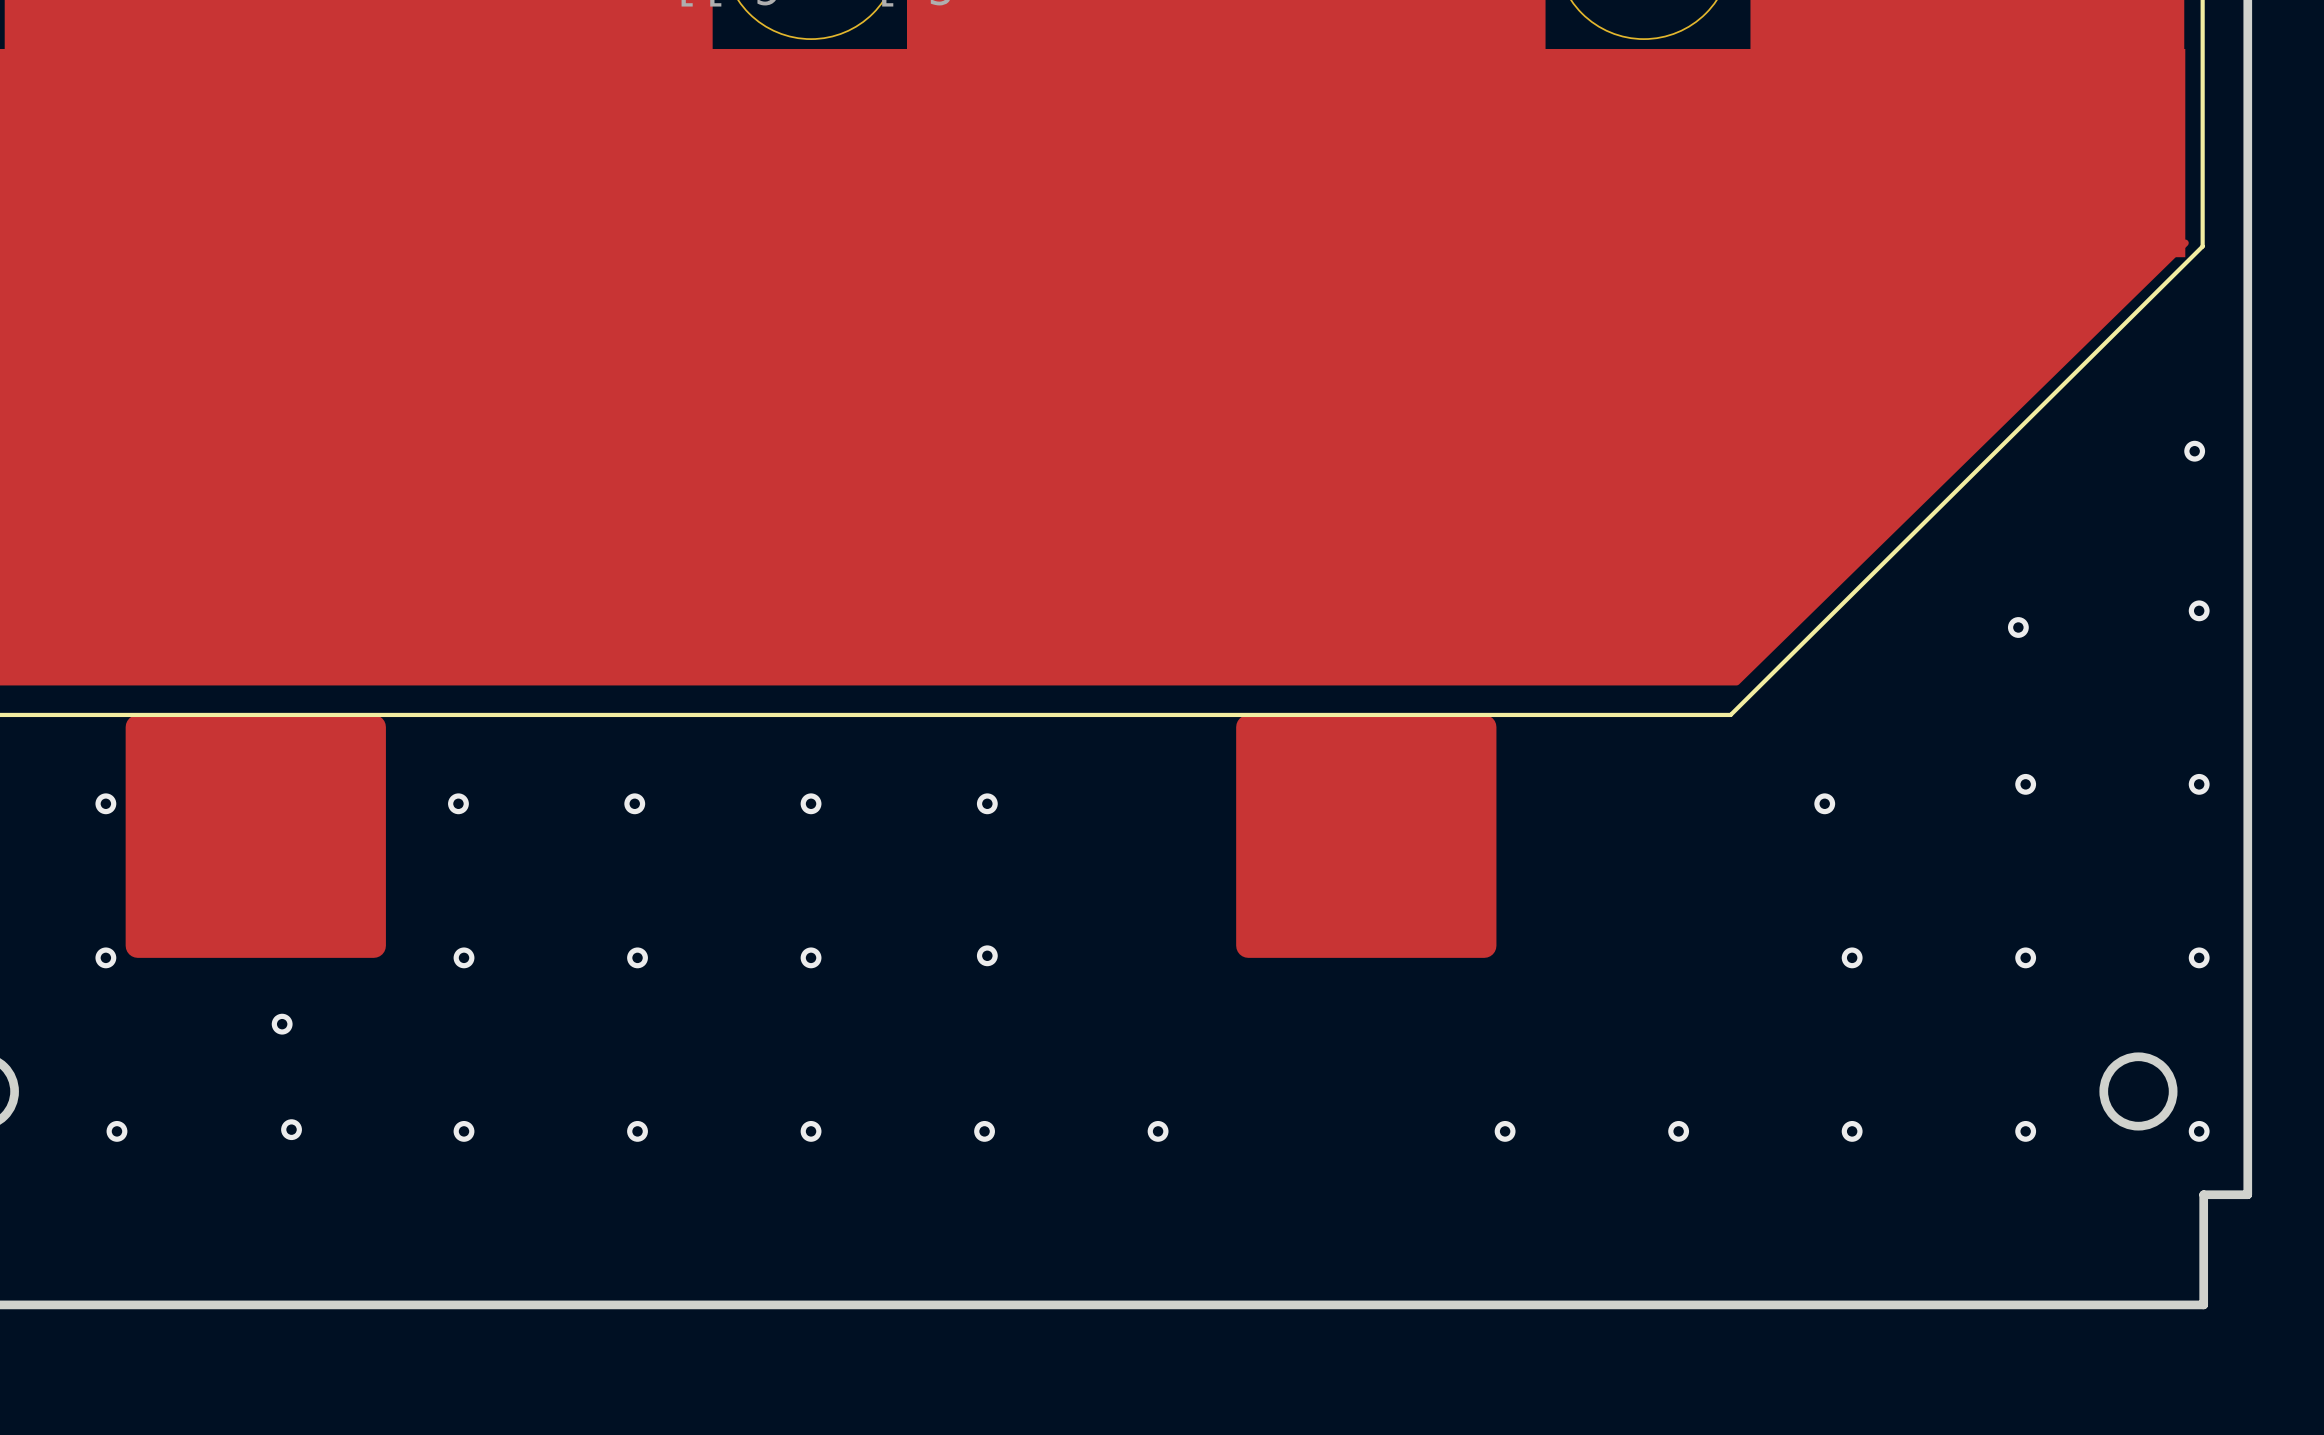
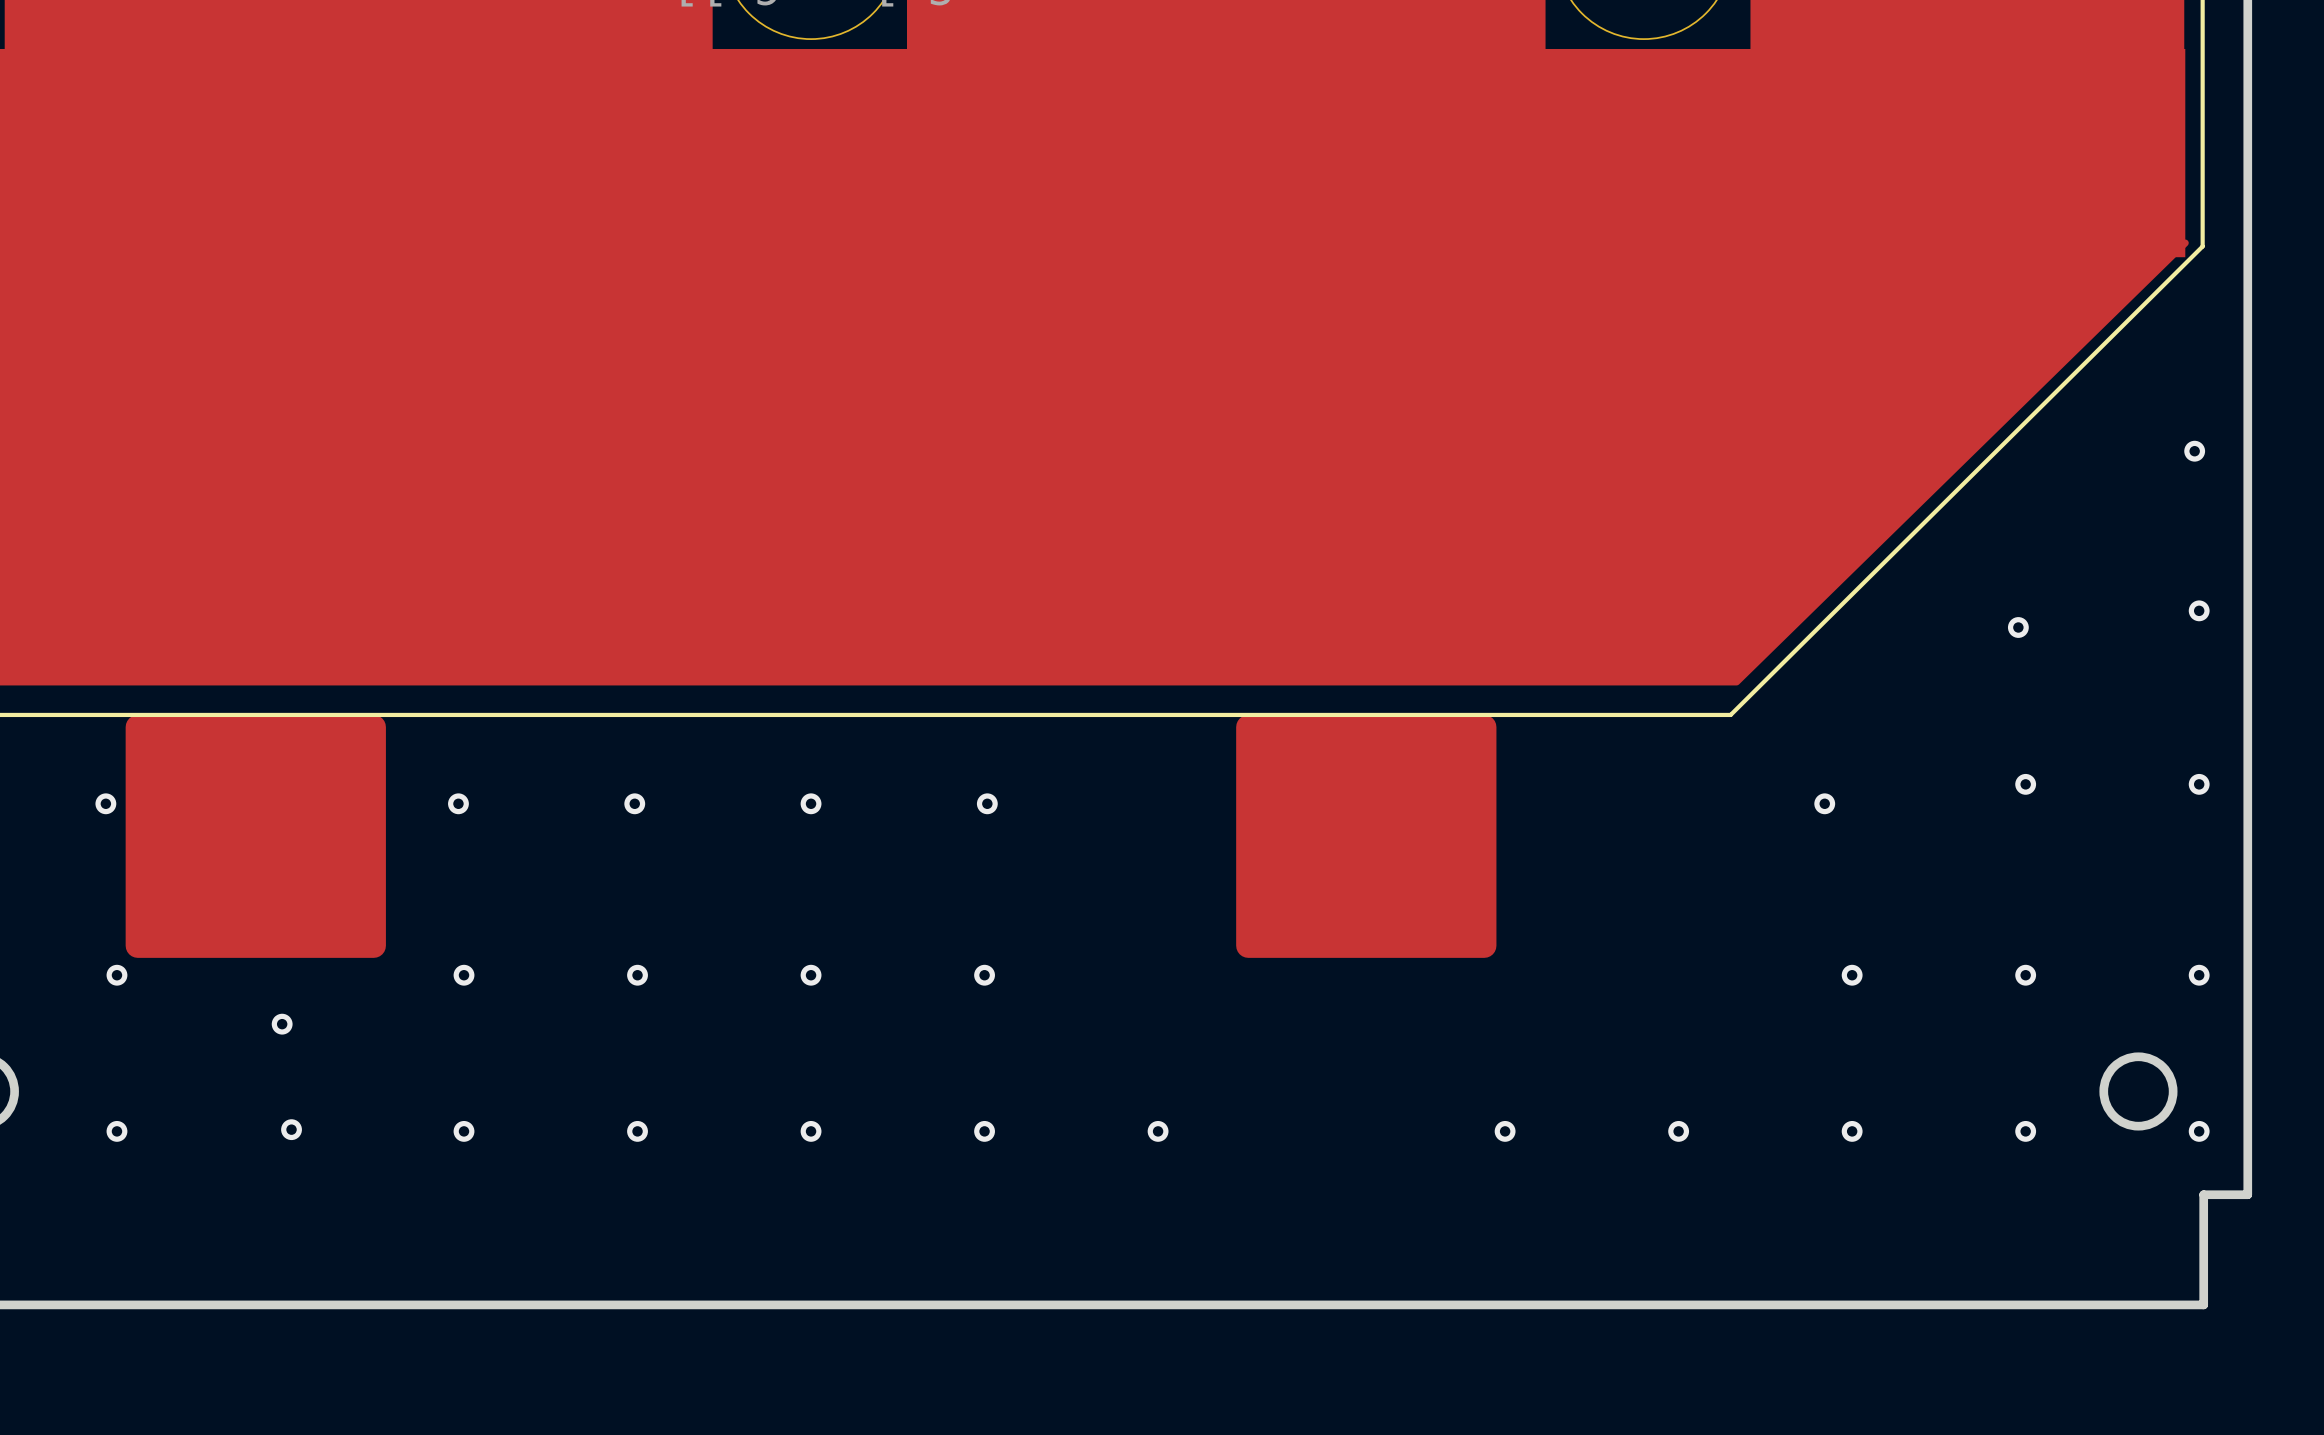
via position: (987, 955) -> (984, 975)
via position: (105, 957) -> (116, 975)
via position: (464, 957) -> (464, 975)
via position: (637, 957) -> (637, 975)
via position: (811, 957) -> (811, 975)
via position: (1852, 957) -> (1852, 975)
via position: (2025, 957) -> (2025, 975)
via position: (2199, 957) -> (2199, 975)

